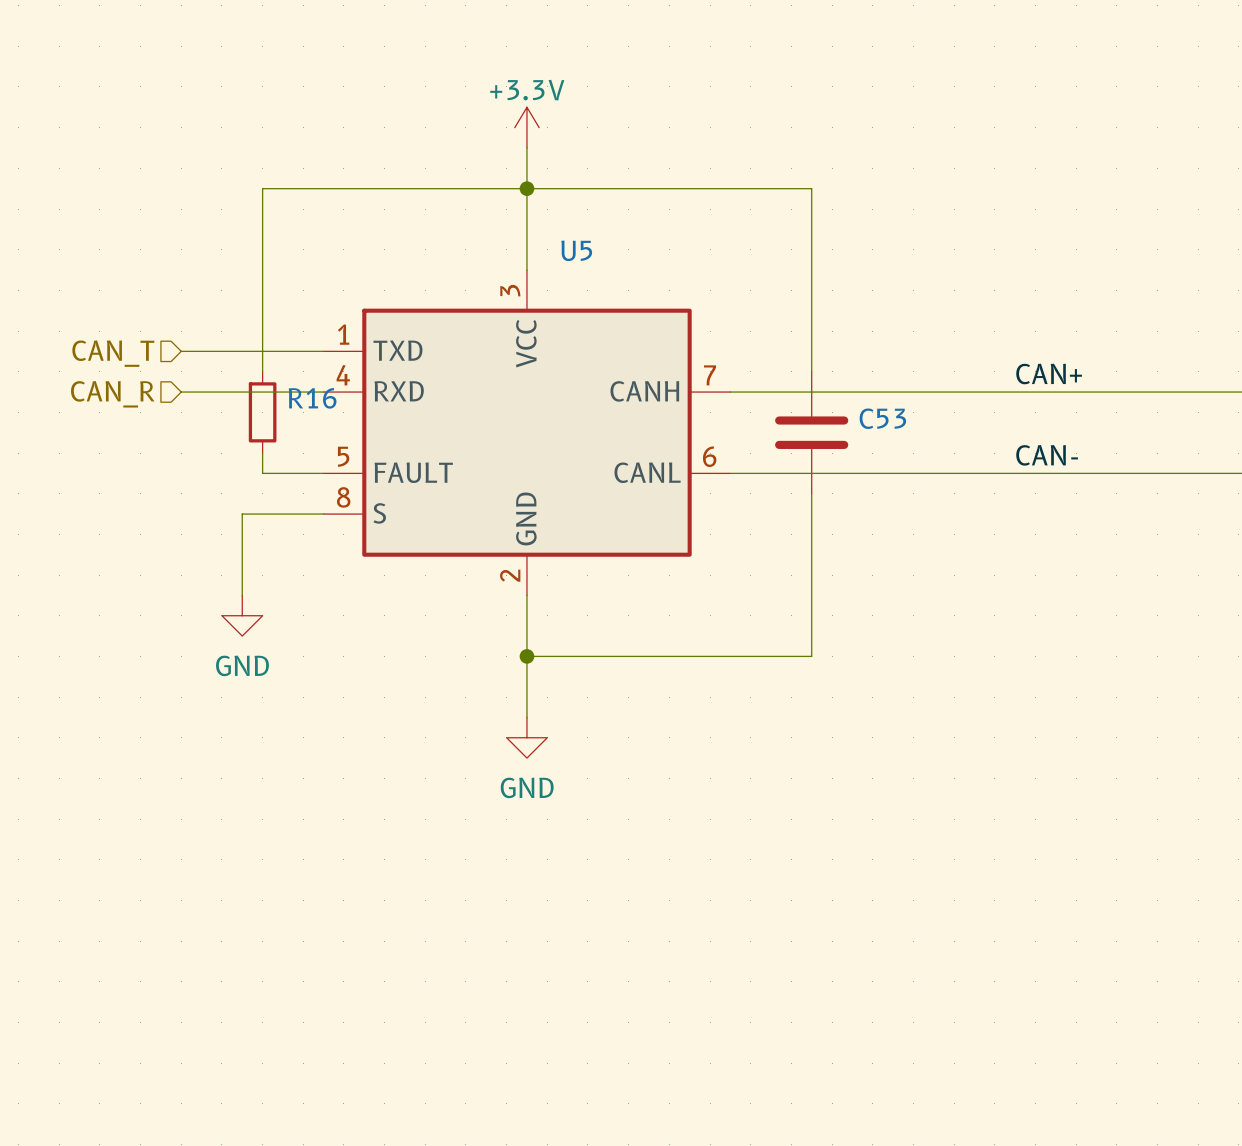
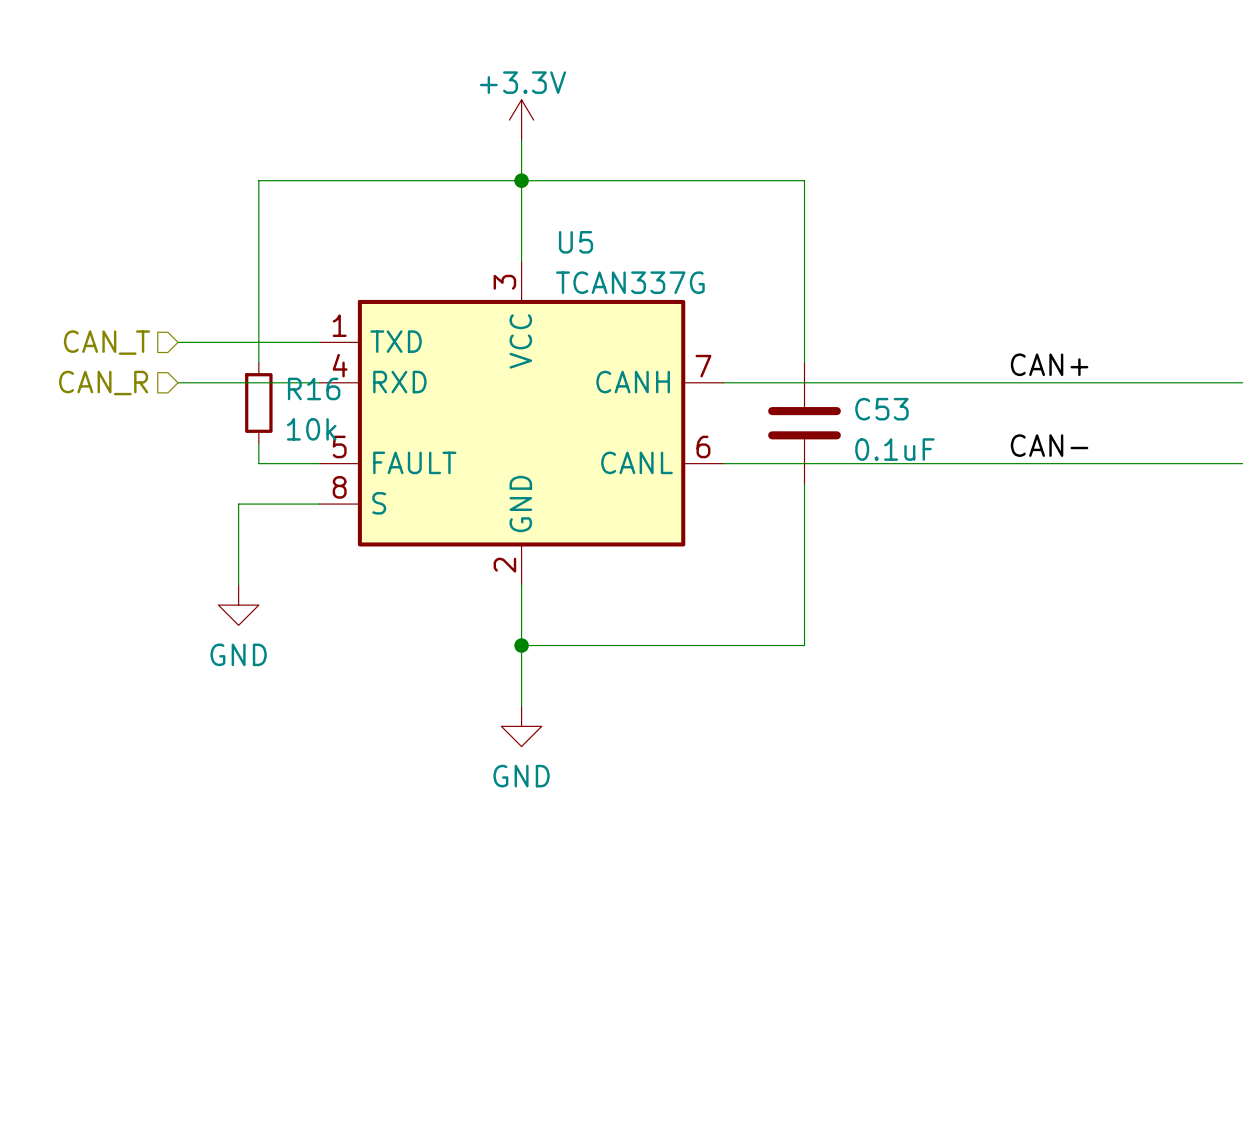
U5 value: none -> TCAN337G (630, 282)
R16 value: none -> 10k (311, 429)
C53 value: none -> 0.1uF (894, 449)

